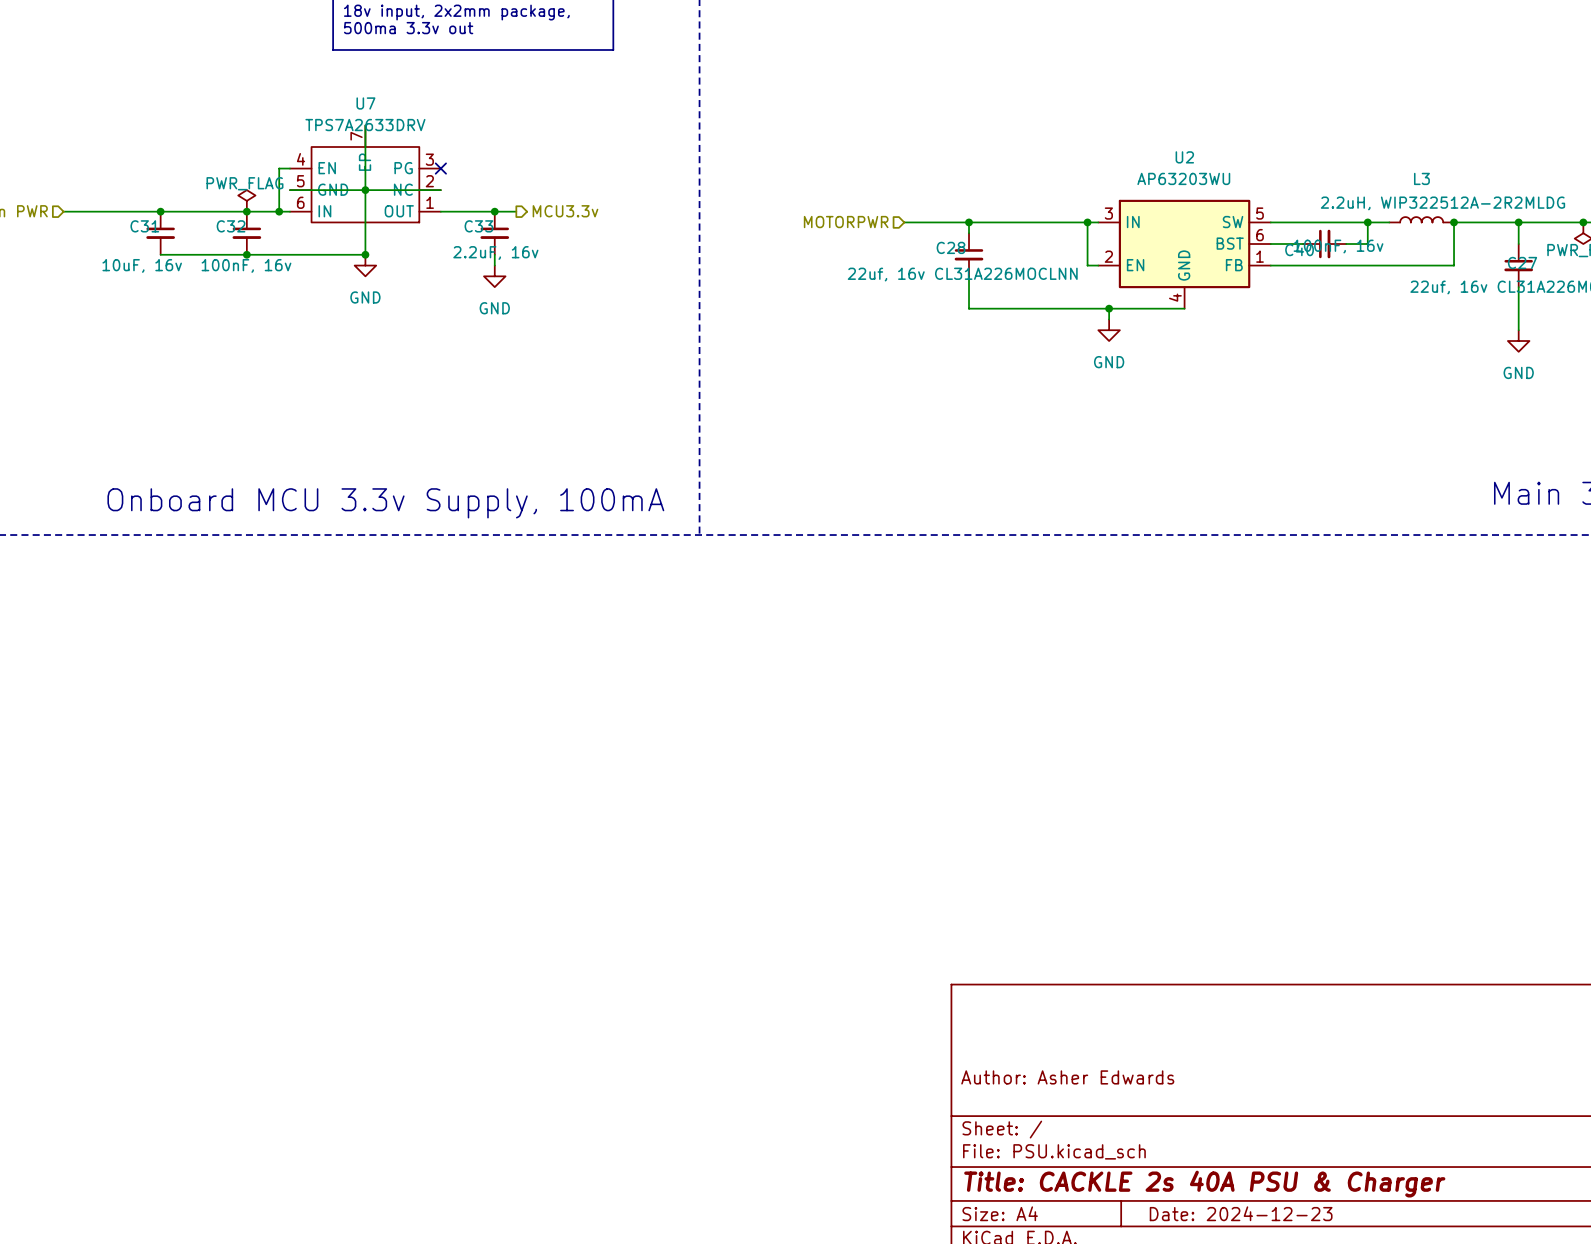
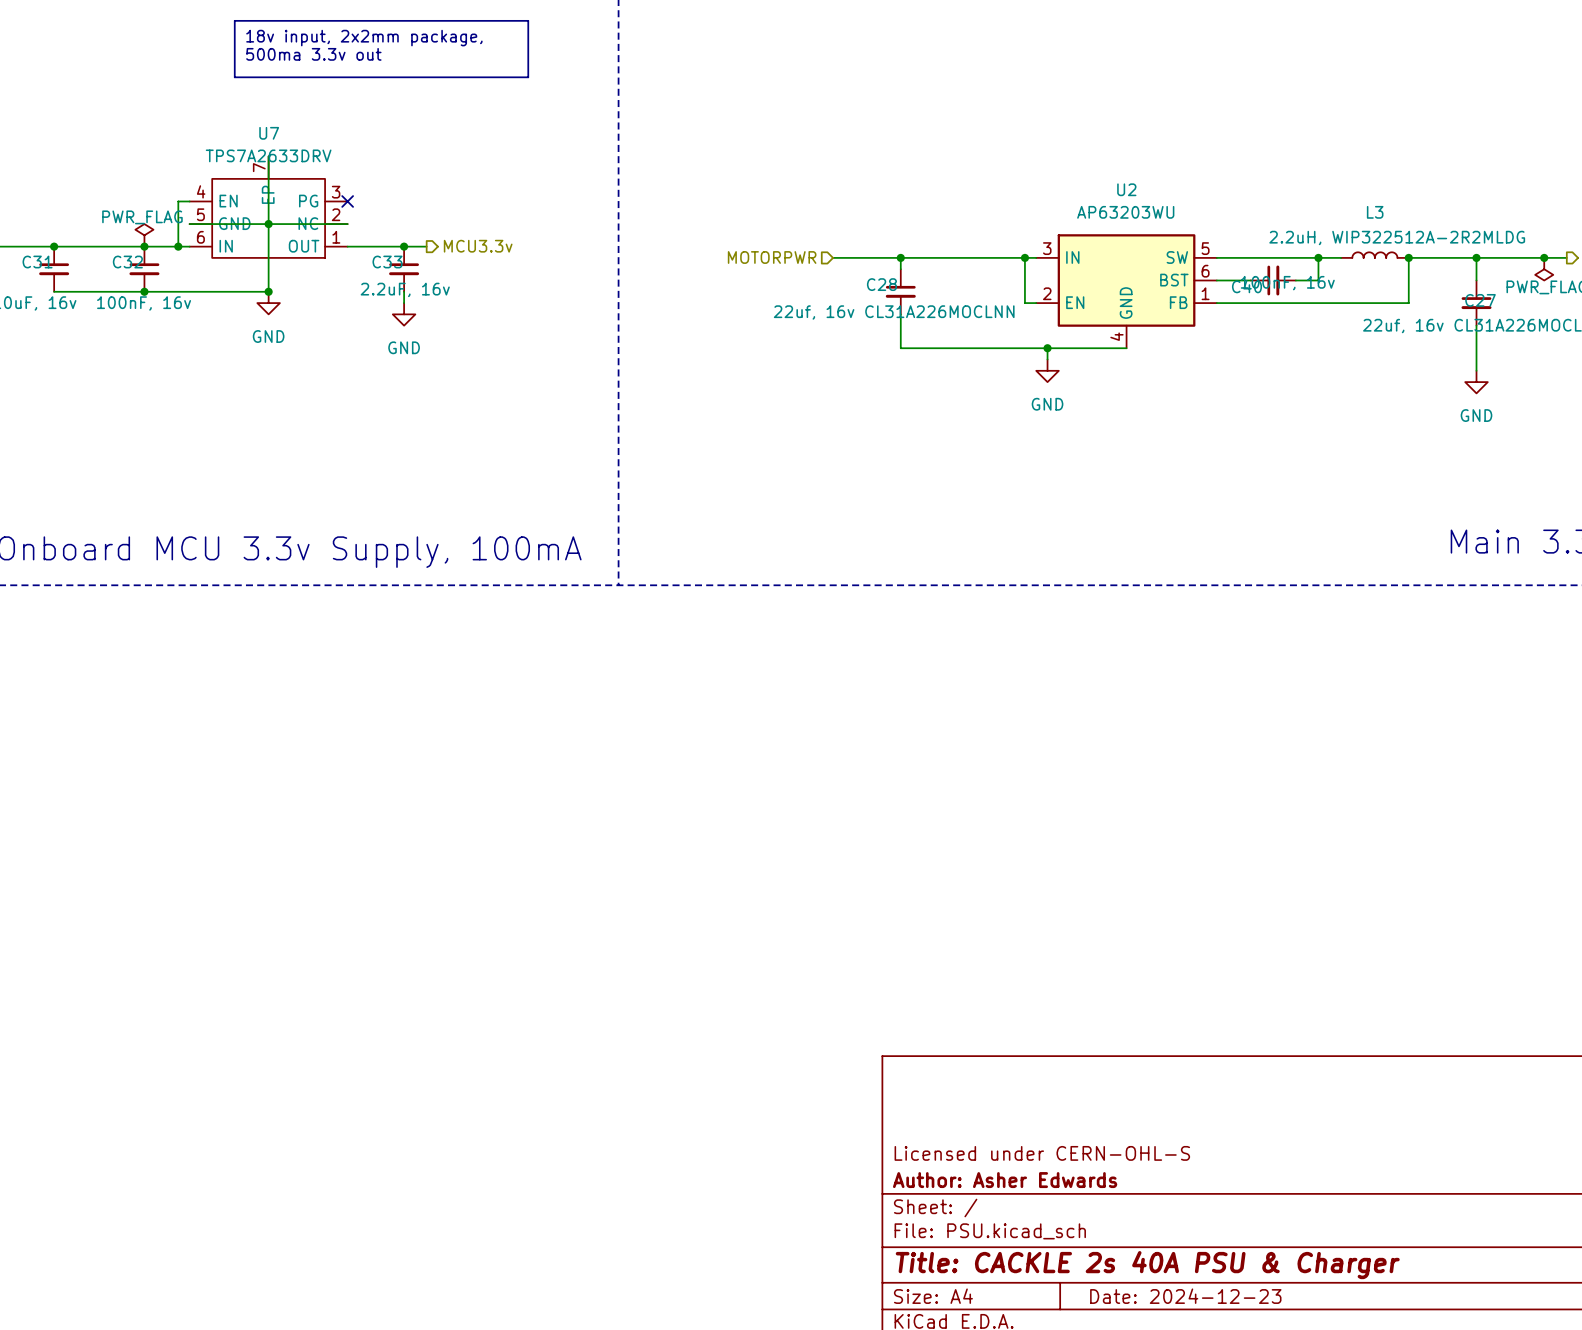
title block: Author: Asher Edwards (1067, 1077) -> Licensed under CERN-OHL-S (1042, 1153)
title block: none -> Author: Asher Edwards (1005, 1180)

